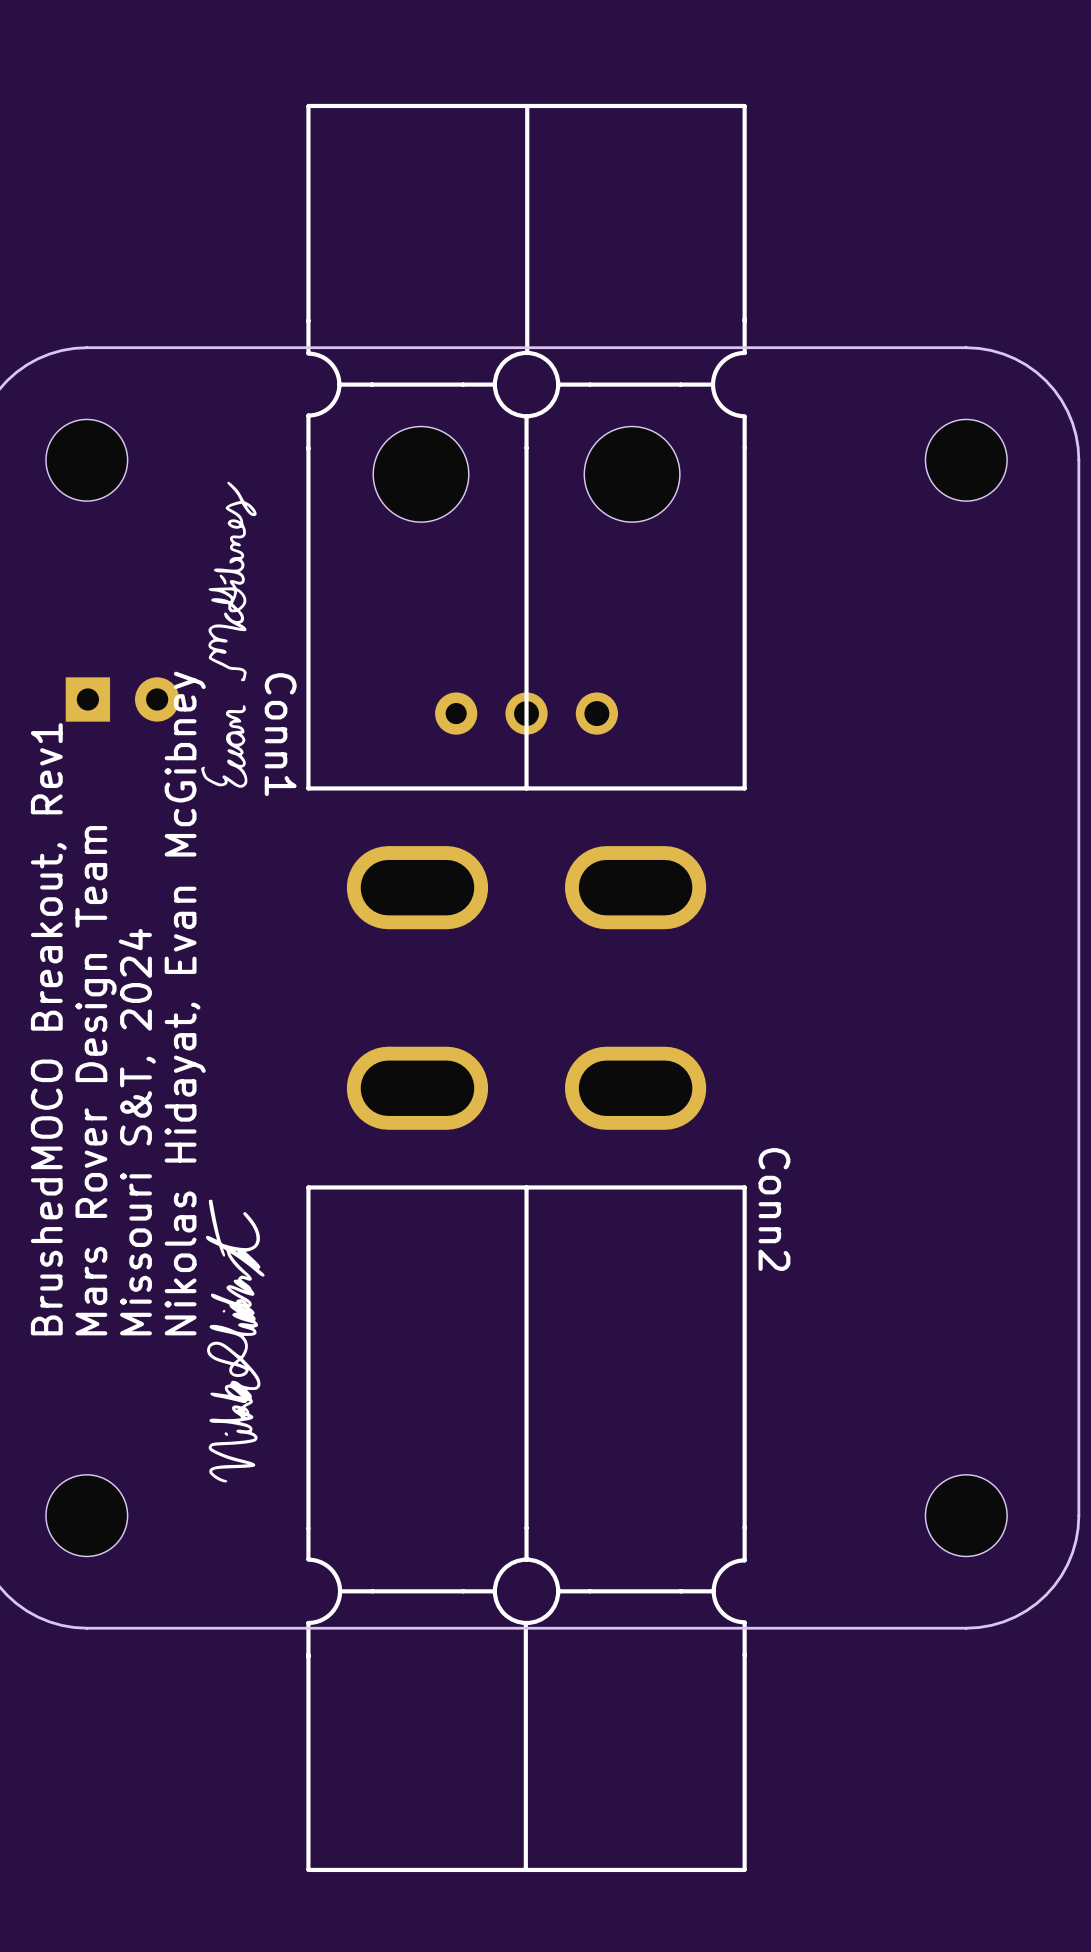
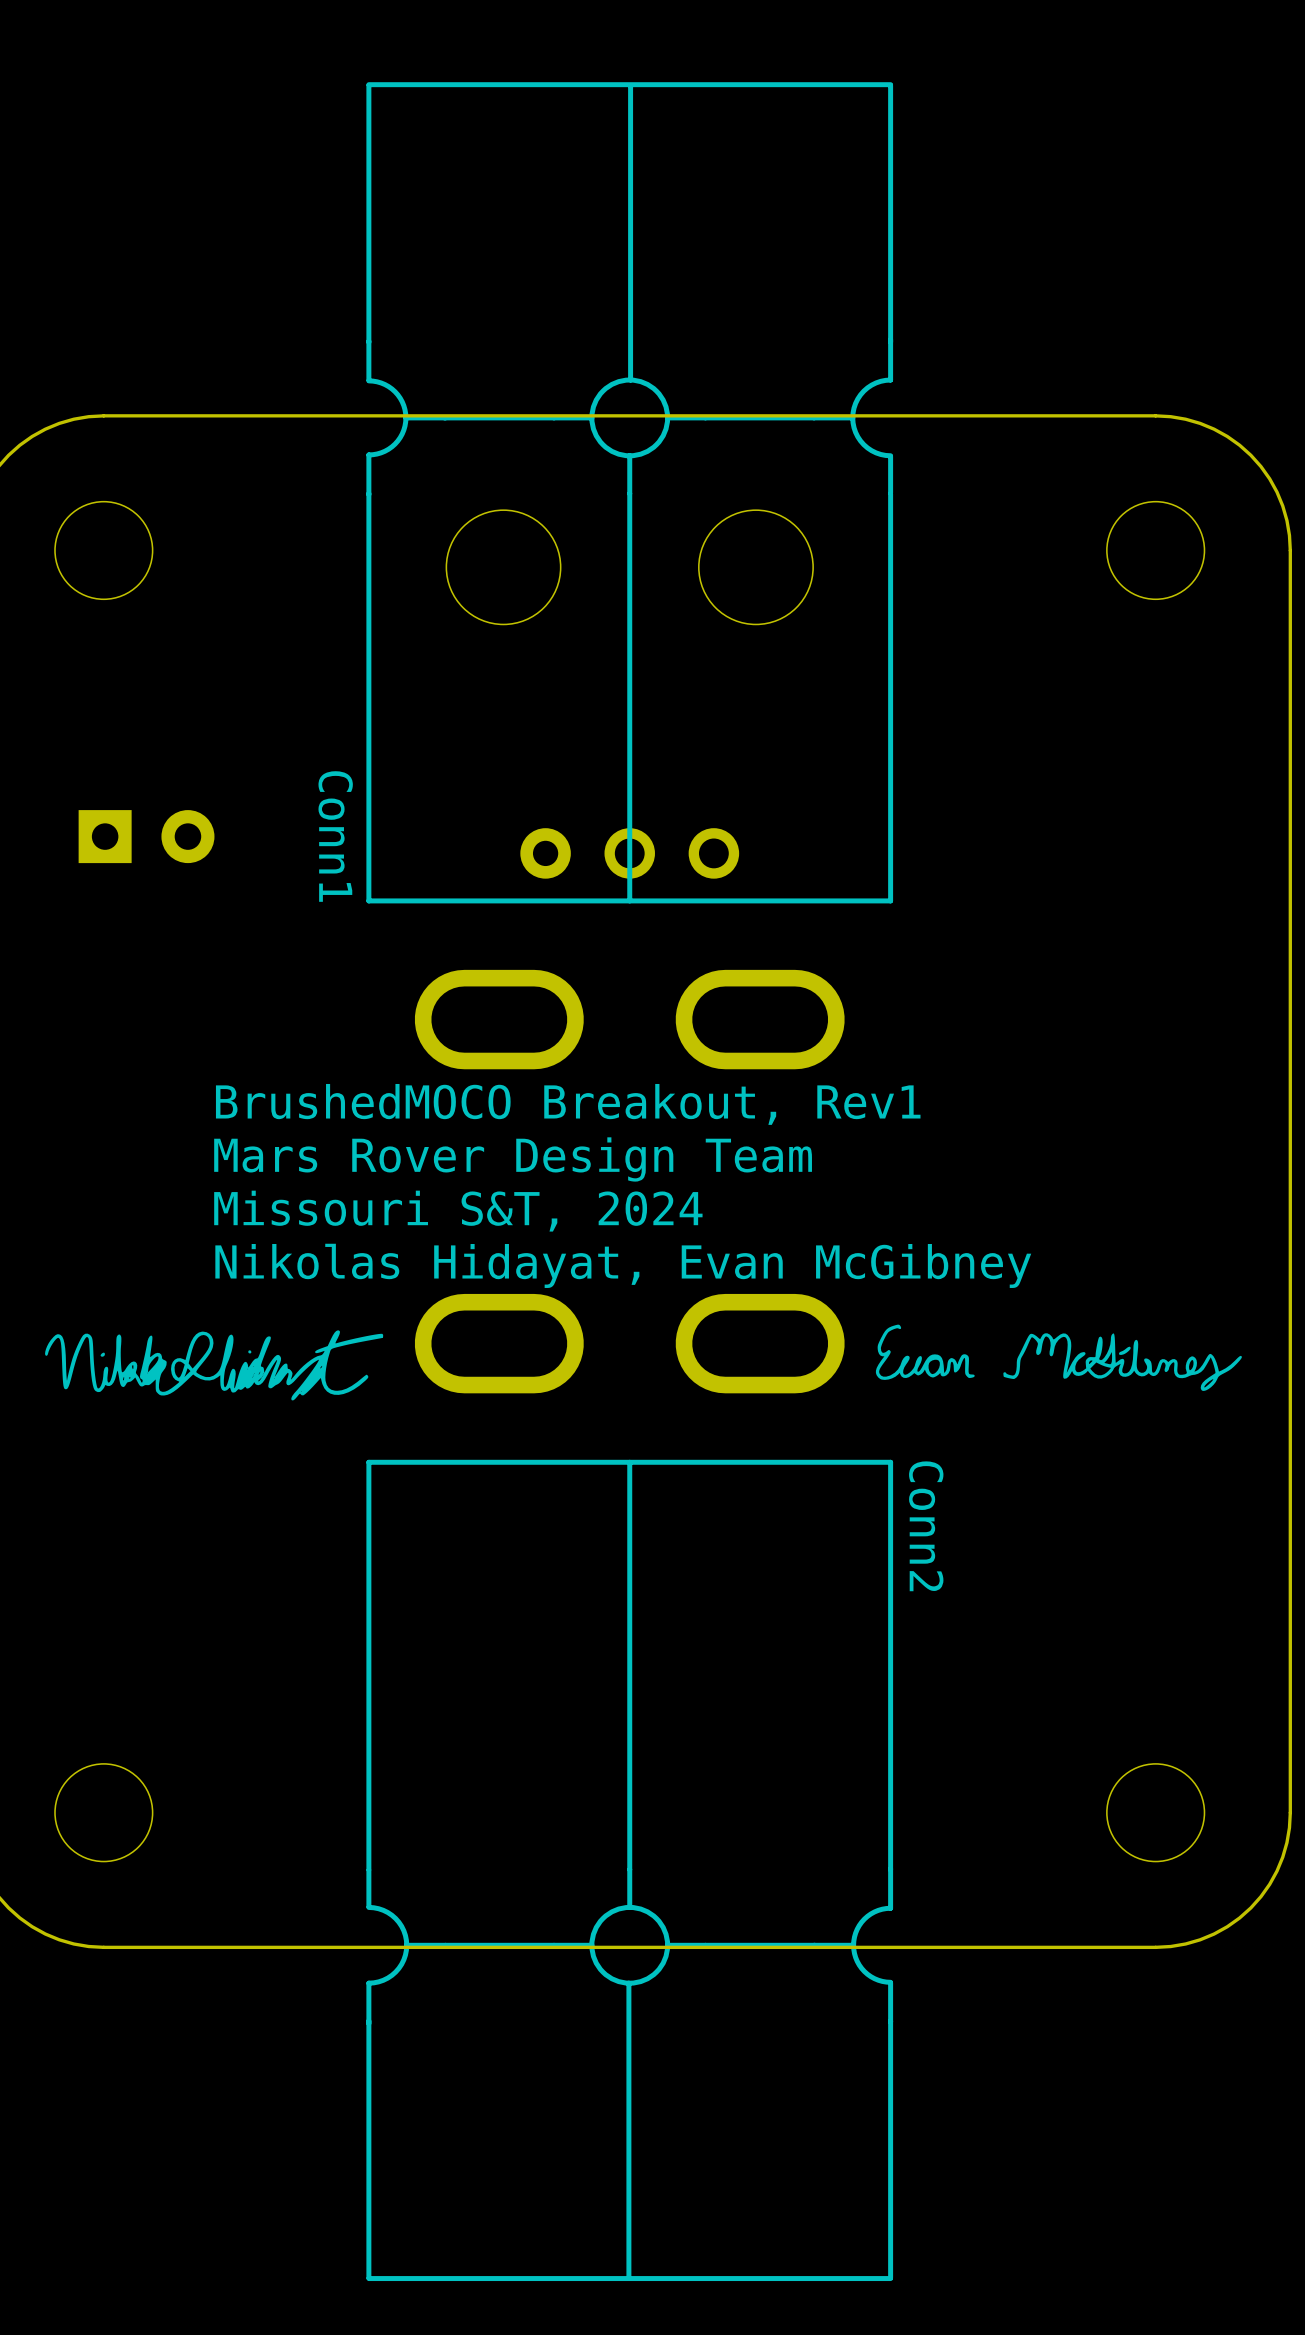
drawing: [201, 481, 257, 788] -> none
Conn1 position: (526, 516) -> (629, 575)
text rotation: 0° (185, 1003) -> 90° clockwise (623, 1265)
text rotation: 0° (48, 1029) -> 90° clockwise (568, 1104)
text rotation: 0° (96, 1080) -> 90° clockwise (513, 1159)
drawing: none -> [875, 1324, 1242, 1391]
drawing: none -> [45, 1330, 384, 1401]
text rotation: 0° (137, 1132) -> 90° clockwise (458, 1211)
drawing: [205, 1199, 265, 1483] -> none
Conn2 name position: Conn2 (774, 1209) -> Conn2 (926, 1526)
Conn2 position: (526, 1459) -> (629, 1787)

